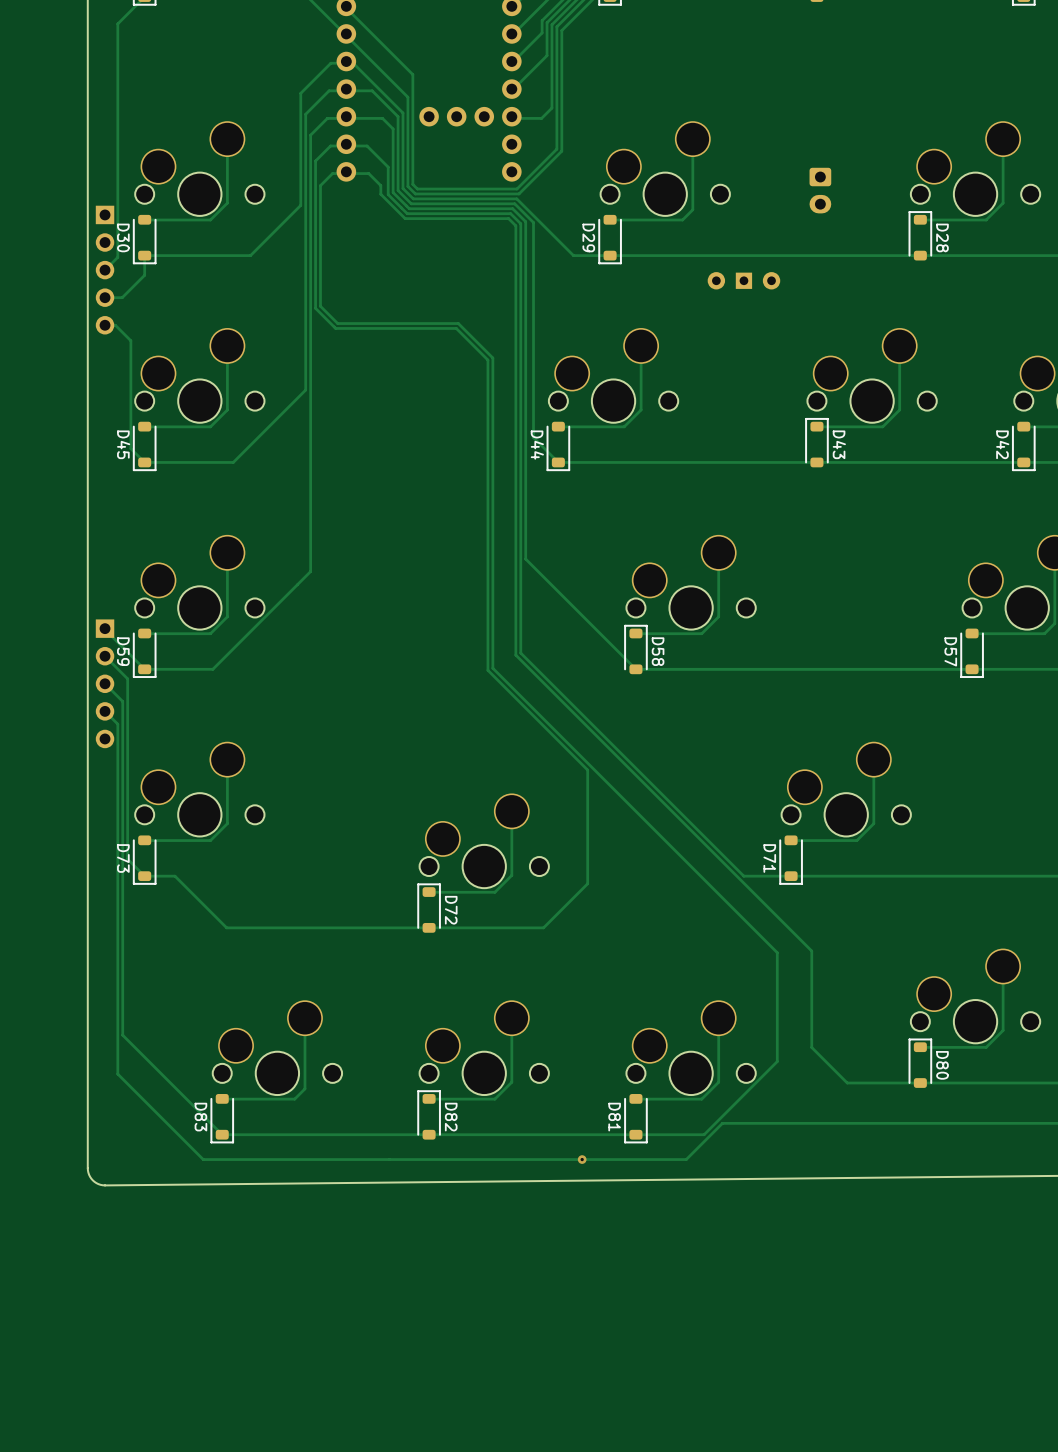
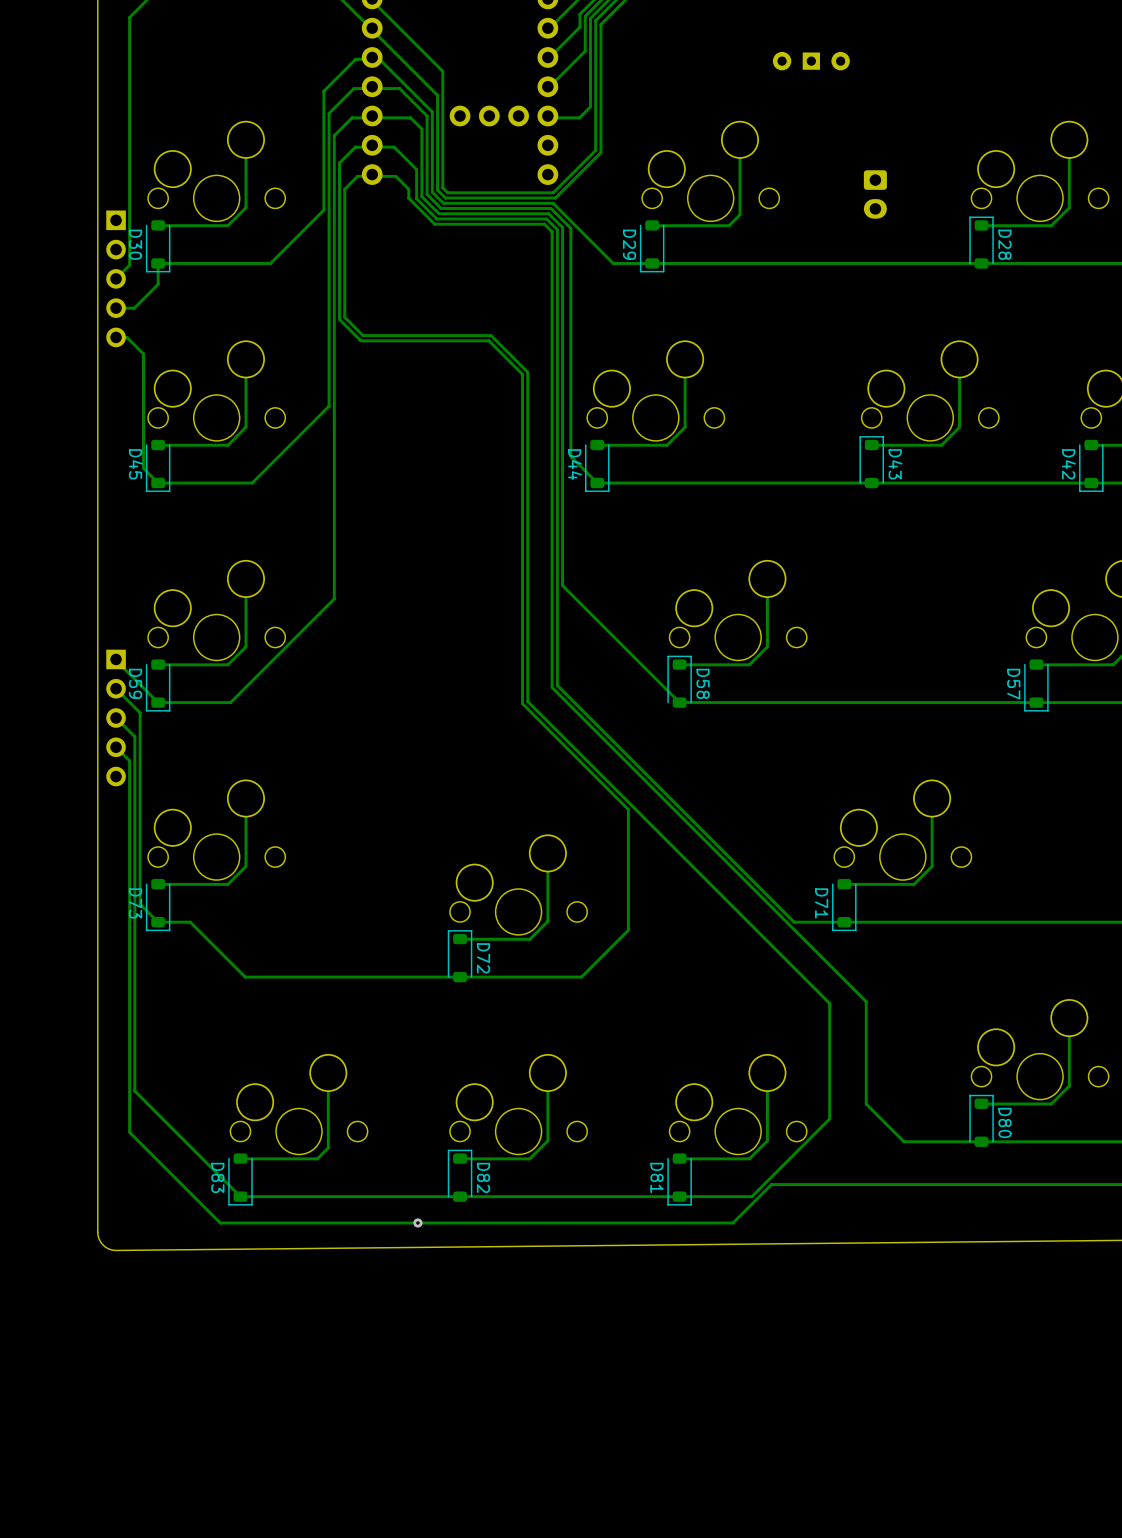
part position: (743, 280) -> (811, 61)
via: none -> (417, 1223)
via: (582, 1159) -> none

